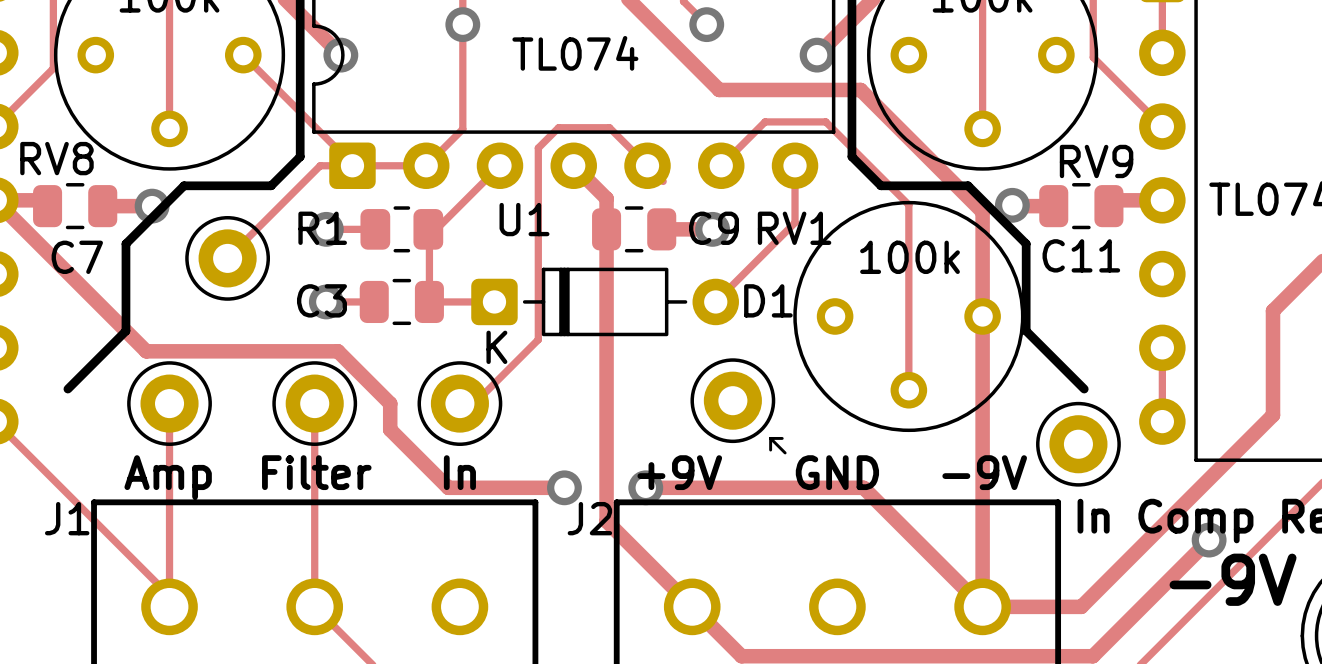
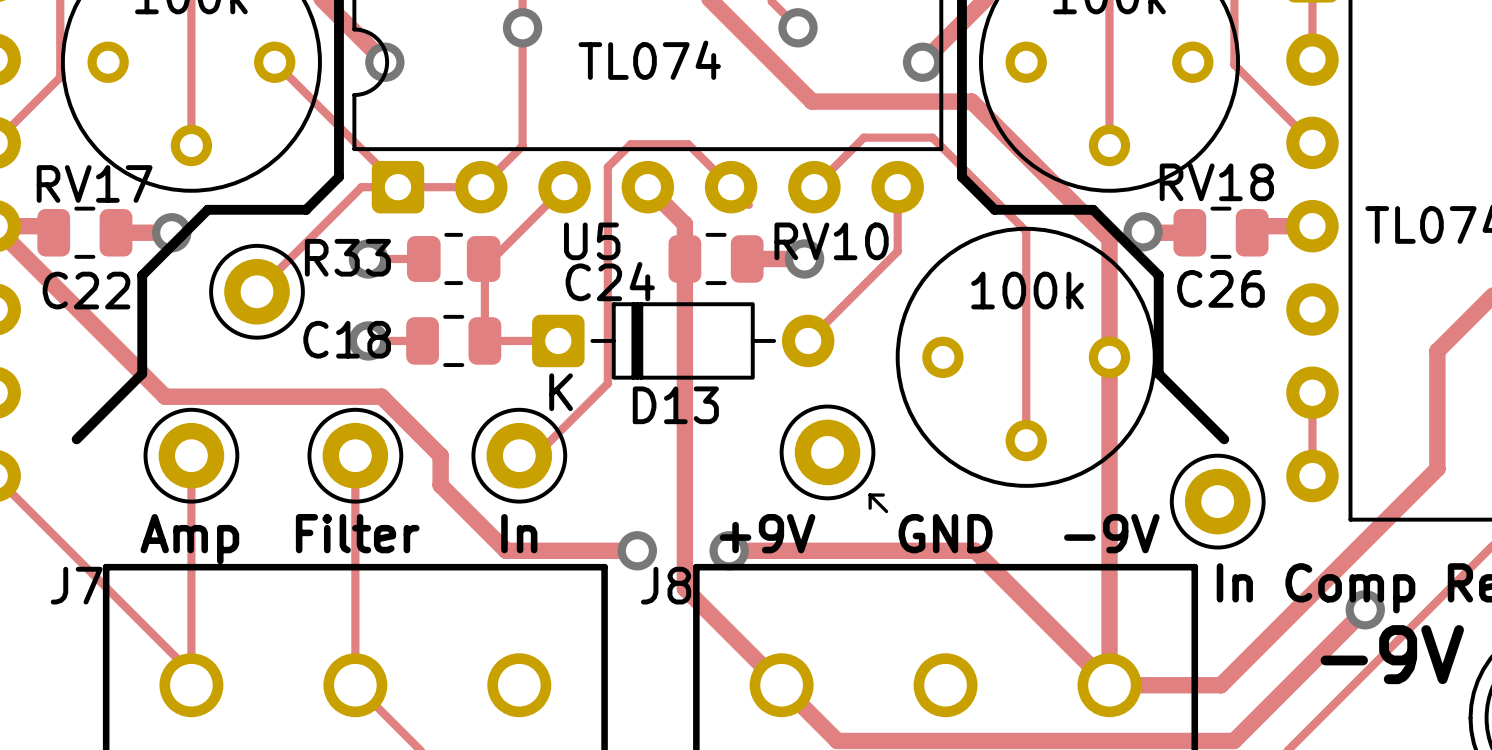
RV8 name: RV8 (56, 158) -> RV17 (94, 183)
RV9 name: RV9 (1096, 161) -> RV18 (1216, 182)
U1 name: U1 (524, 219) -> U5 (592, 241)
R1 name: R1 (322, 228) -> R33 (347, 257)
C9 name: C9 (714, 228) -> C24 (610, 281)
RV1 name: RV1 (794, 228) -> RV10 (831, 241)
C11 name: C11 (1081, 255) -> C26 (1220, 288)
C7 name: C7 (77, 257) -> C22 (86, 290)
C3 name: C3 (321, 300) -> C18 (347, 339)
D1 name: D1 (768, 300) -> D13 (675, 405)
J1 name: J1 (67, 518) -> J7 (76, 585)
J2 name: J2 (589, 518) -> J8 (666, 585)

